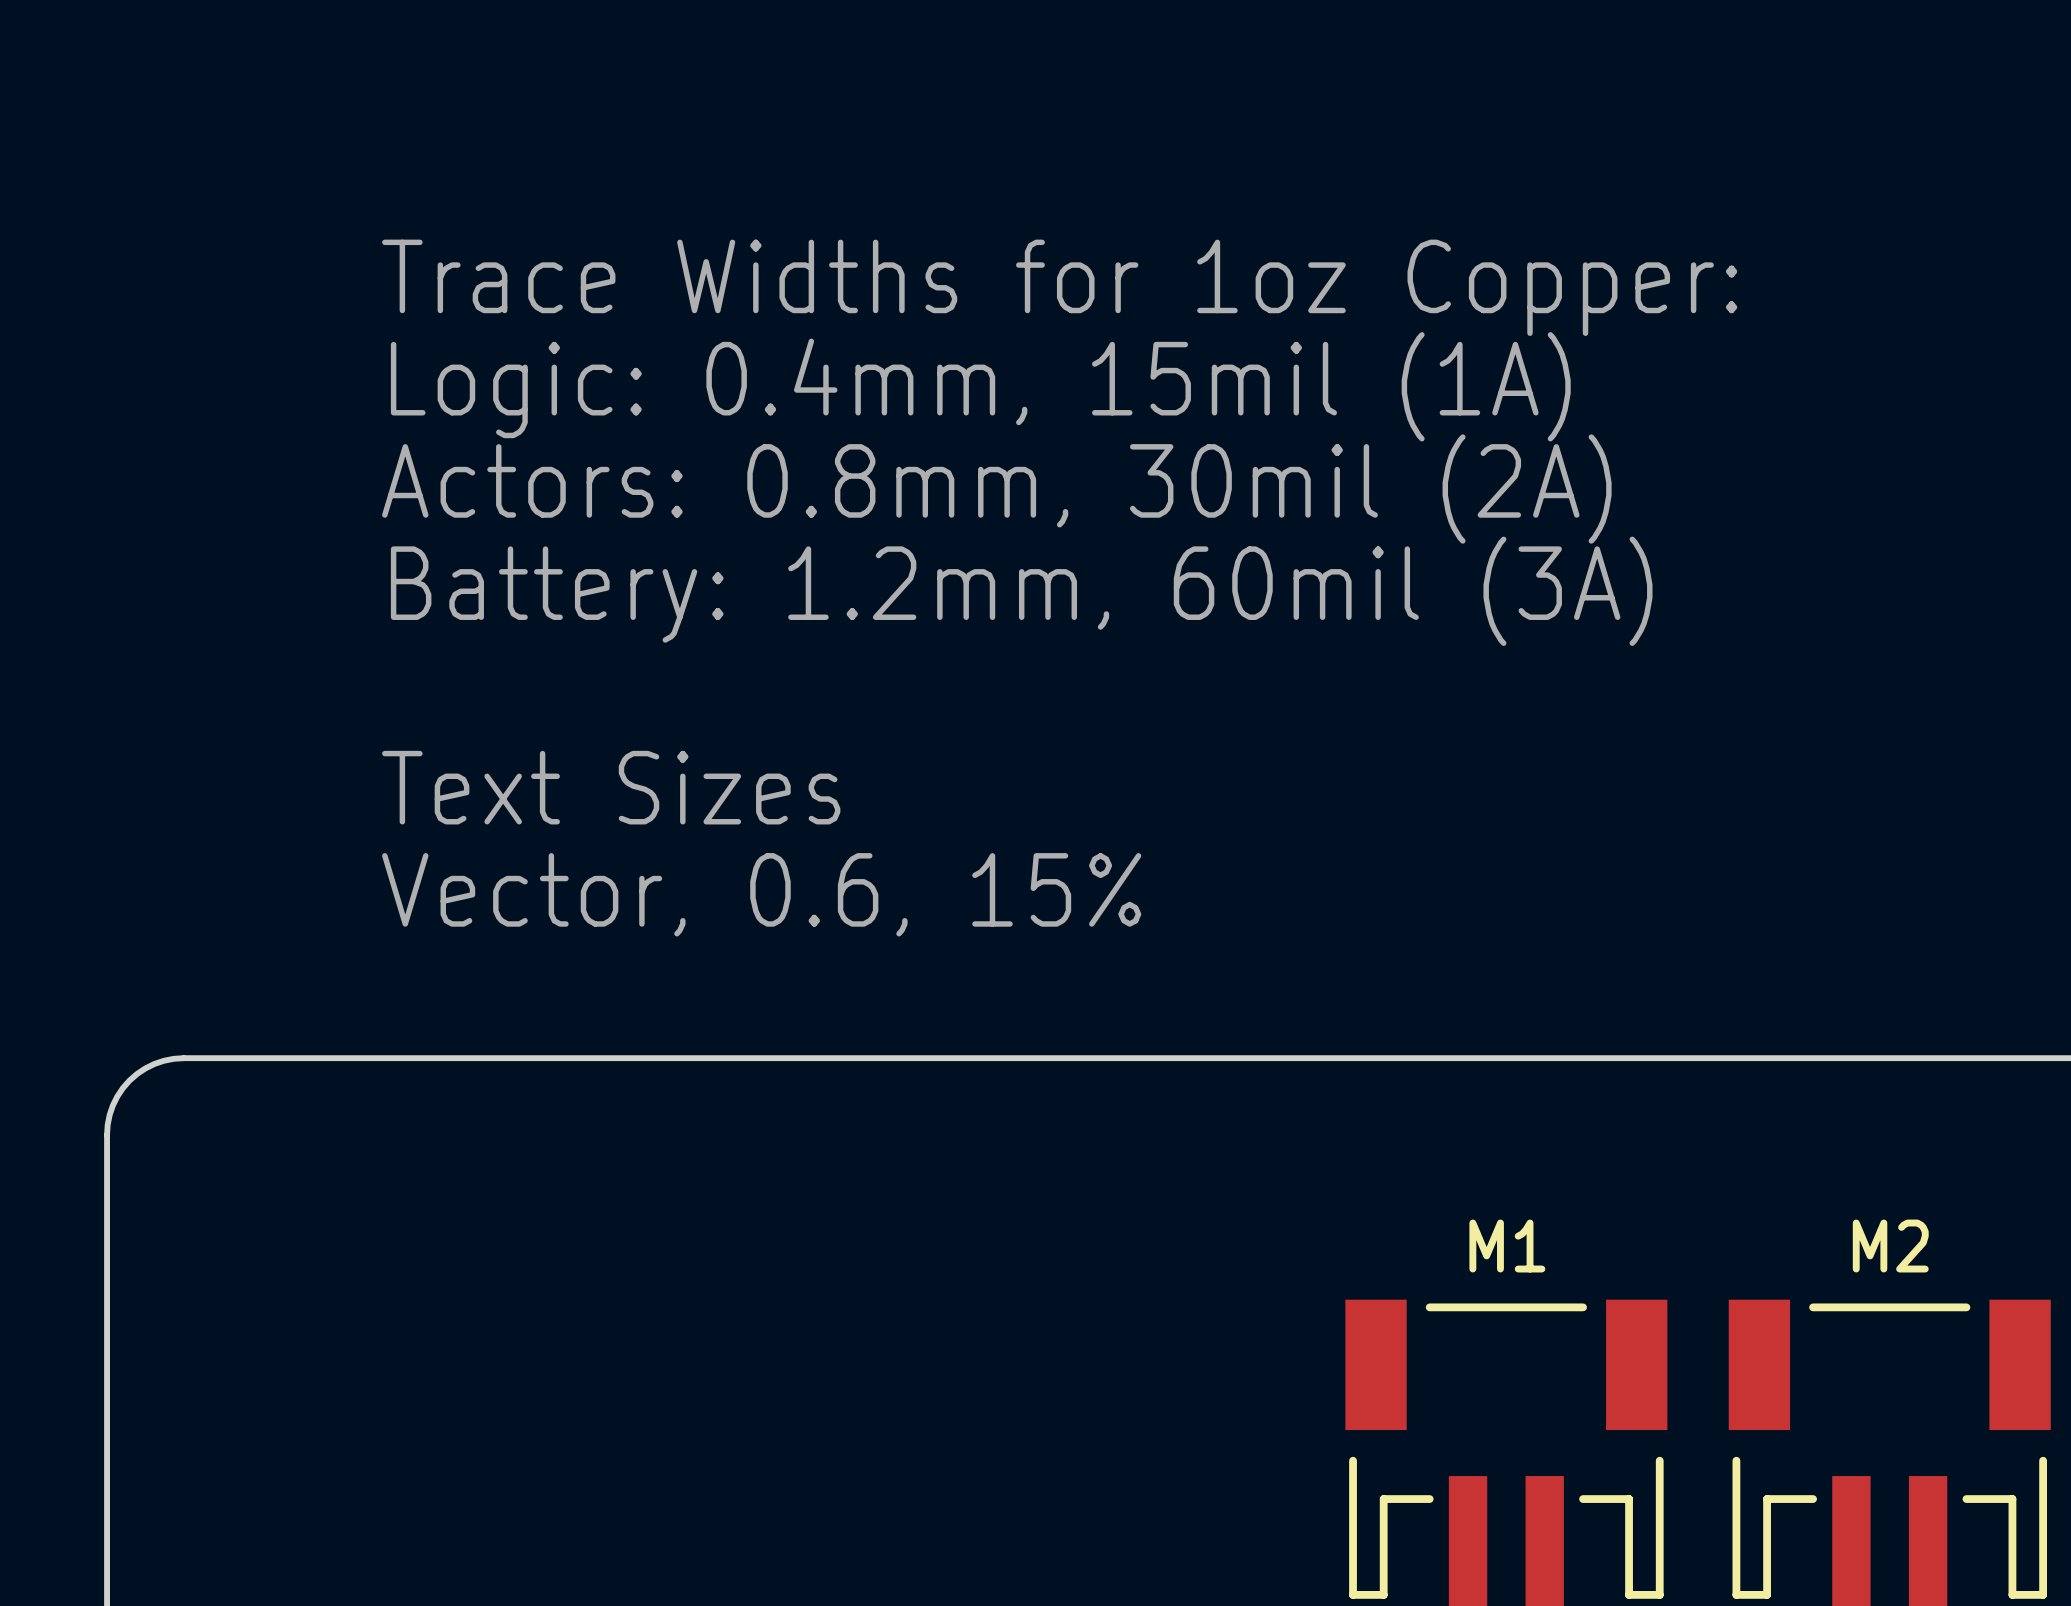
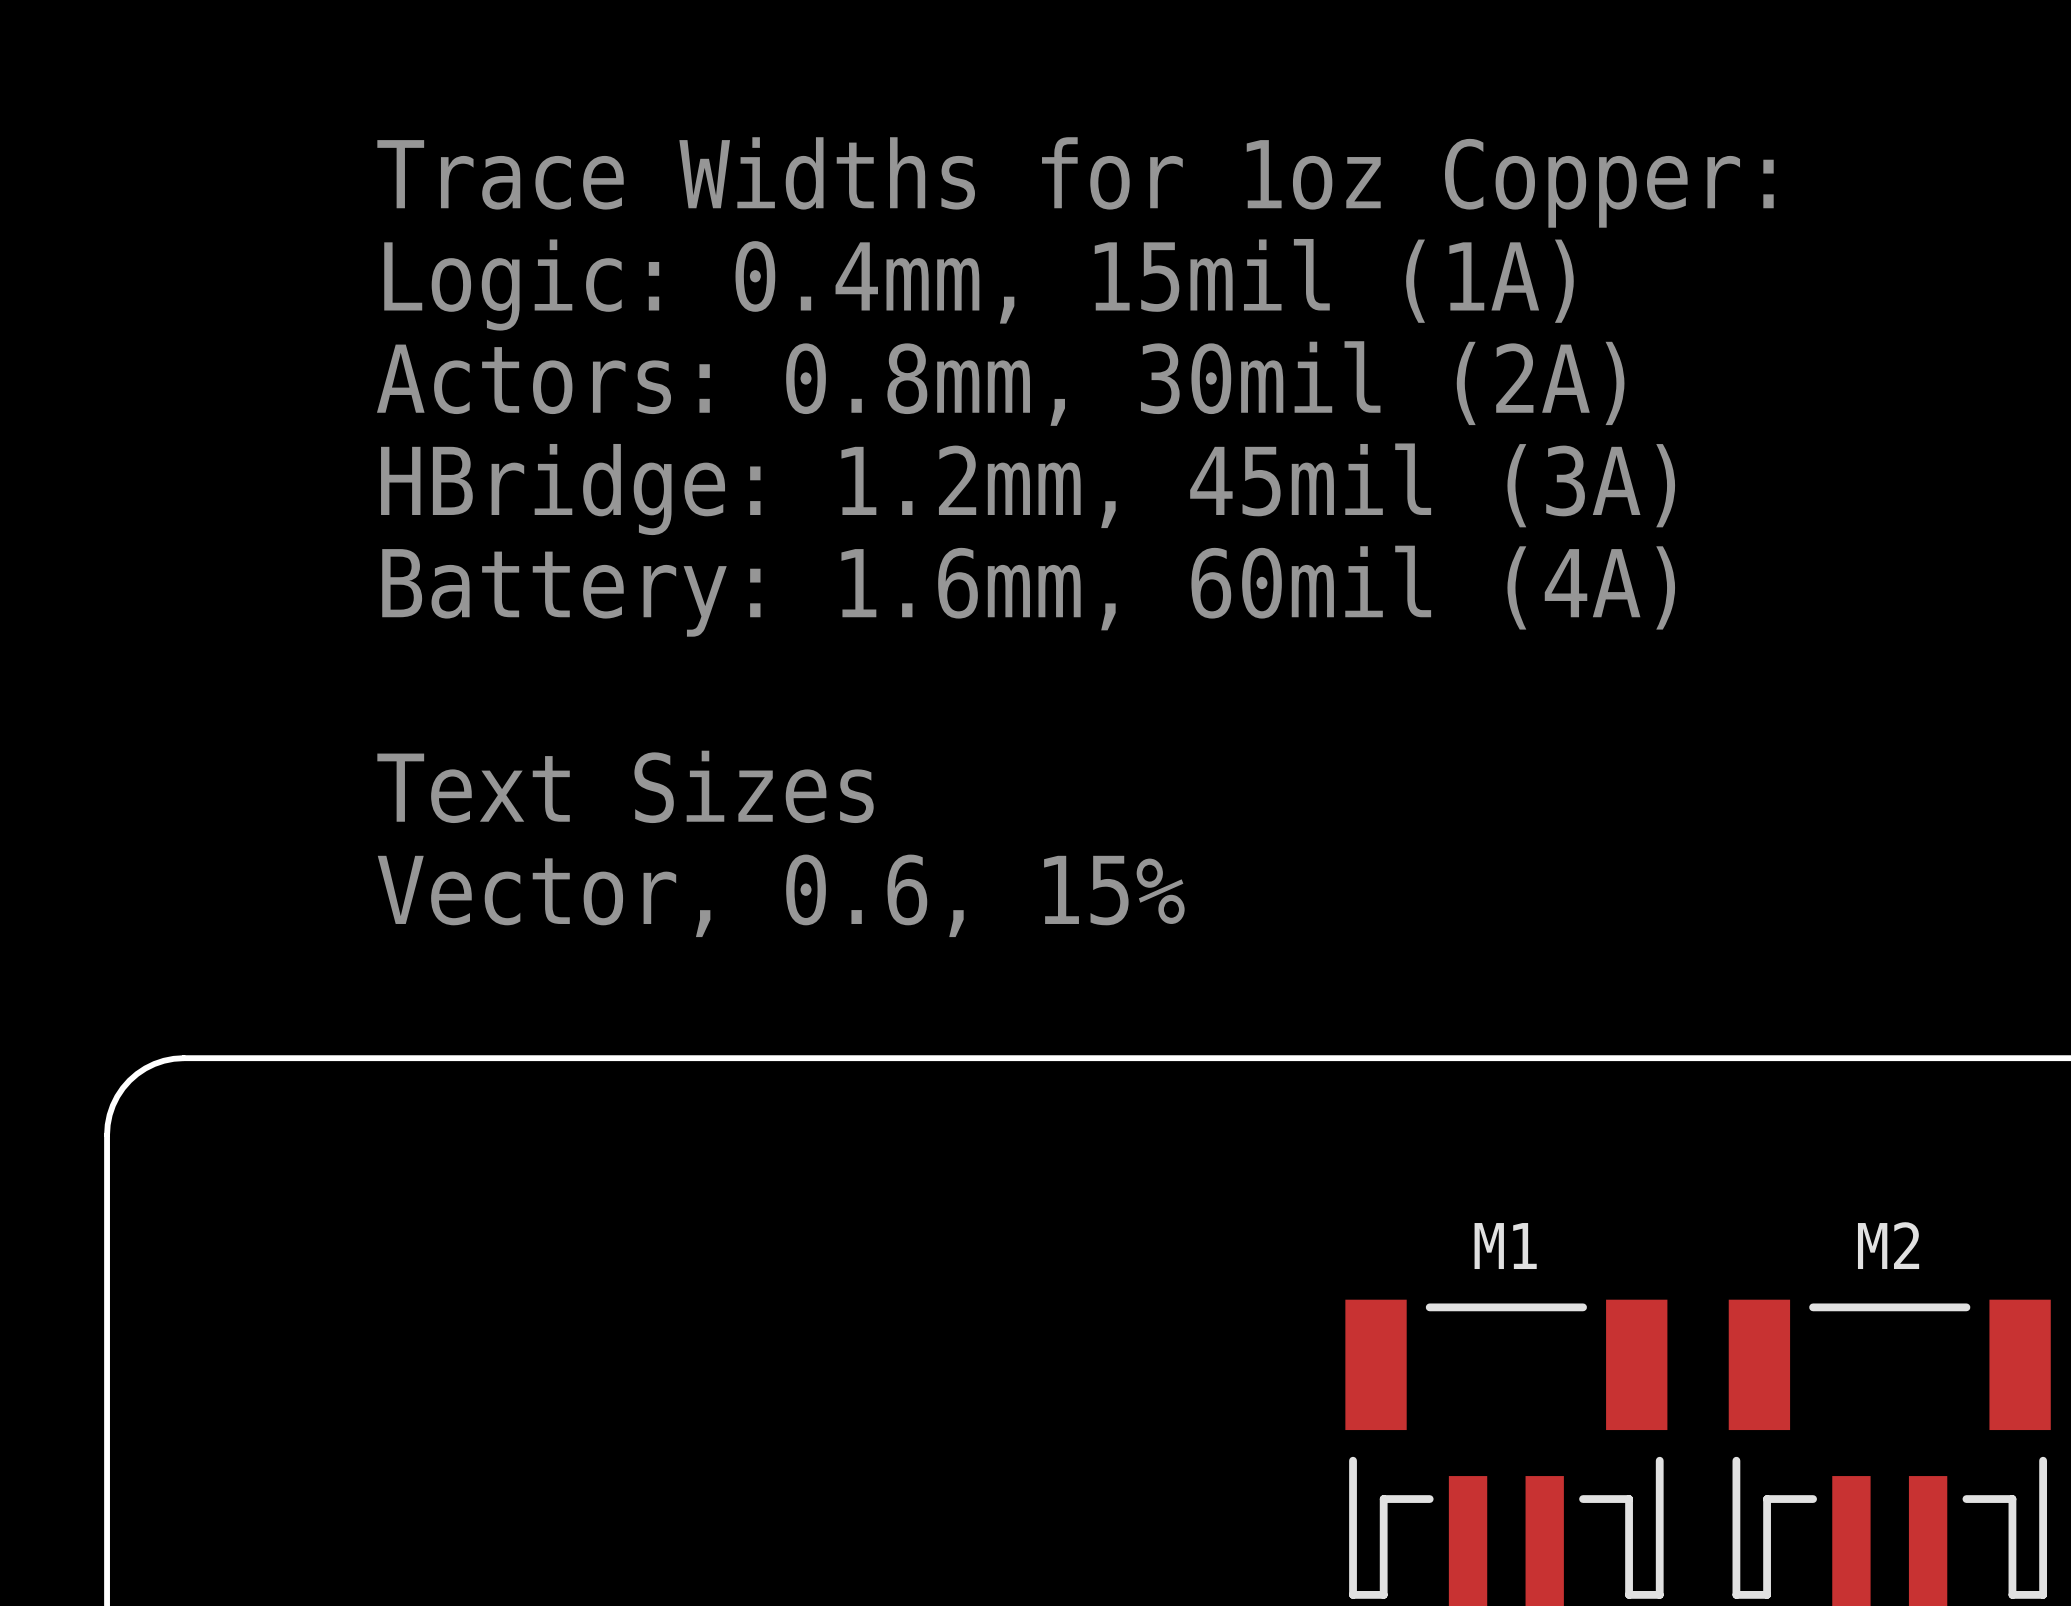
text: none -> Trace Widths for 1oz Copper: (1075, 182)
text: Trace Widths for 1oz Copper: (1059, 287) -> Logic: 0.4mm, 15mil (1A) (979, 284)
text: Logic: 0.4mm, 15mil (1A) (980, 386) -> Actors: 0.8mm, 30mil (2A) (1000, 383)
text: Actors: 0.8mm, 30mil (2A) (996, 489) -> HBridge: 1.2mm, 45mil (3A) (1028, 489)
text: Battery: 1.2mm, 60mil (3A) (1021, 591) -> Battery: 1.6mm, 60mil (4A) (1028, 591)

